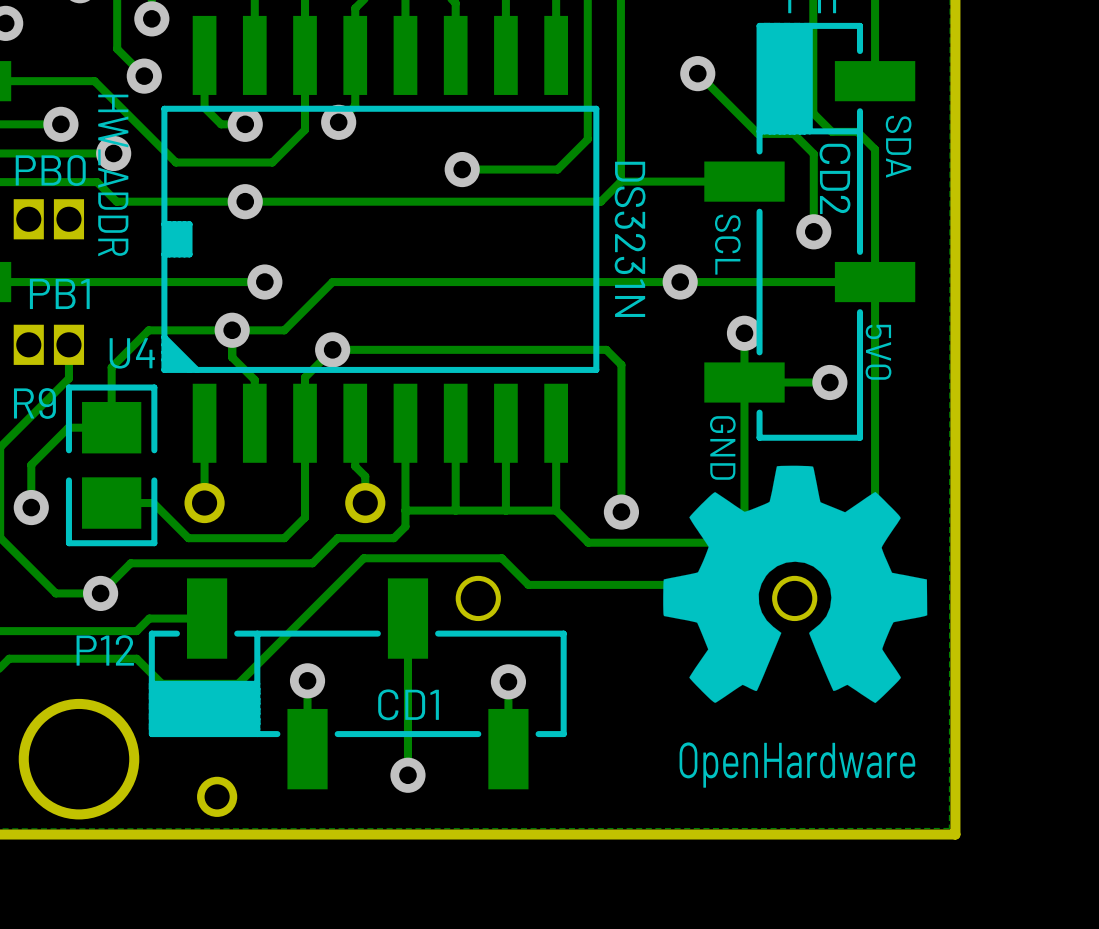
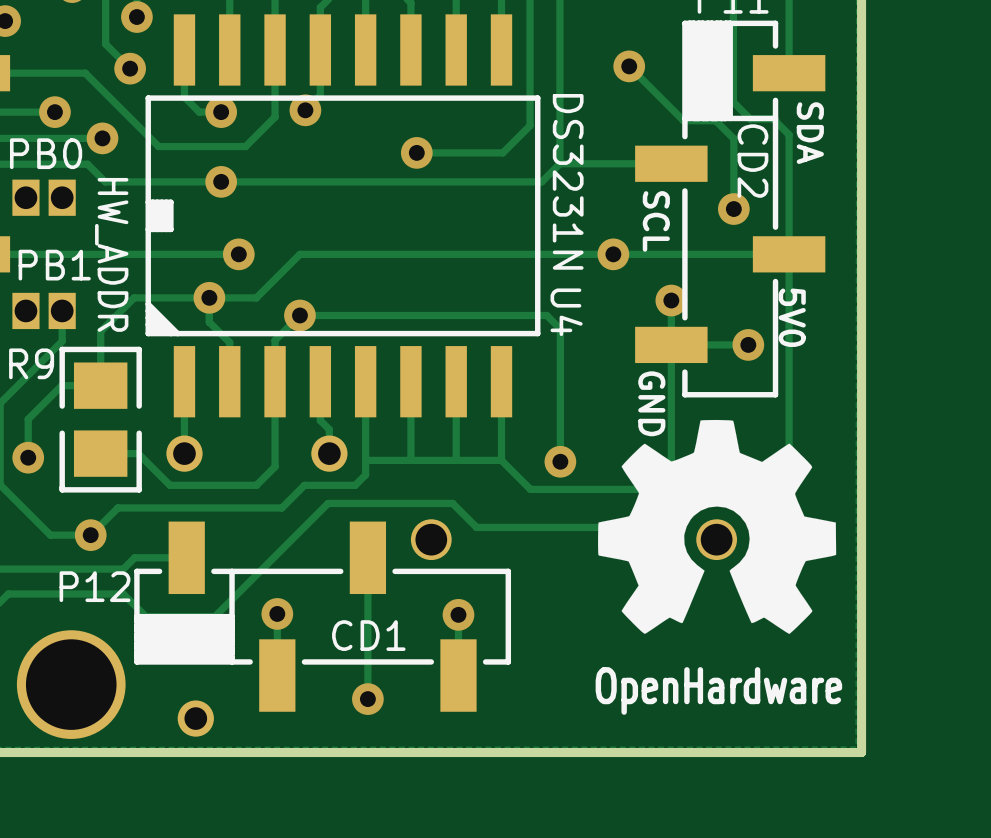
text position: HW_ADDR (113, 175) -> HW_ADDR (111, 254)
U4 value position: DS3231N (630, 239) -> DS3231N (568, 181)
U4 name rotation: 0° (132, 353) -> 90° clockwise (566, 312)
U4 name position: U4 (132, 353) -> U4 (566, 312)

